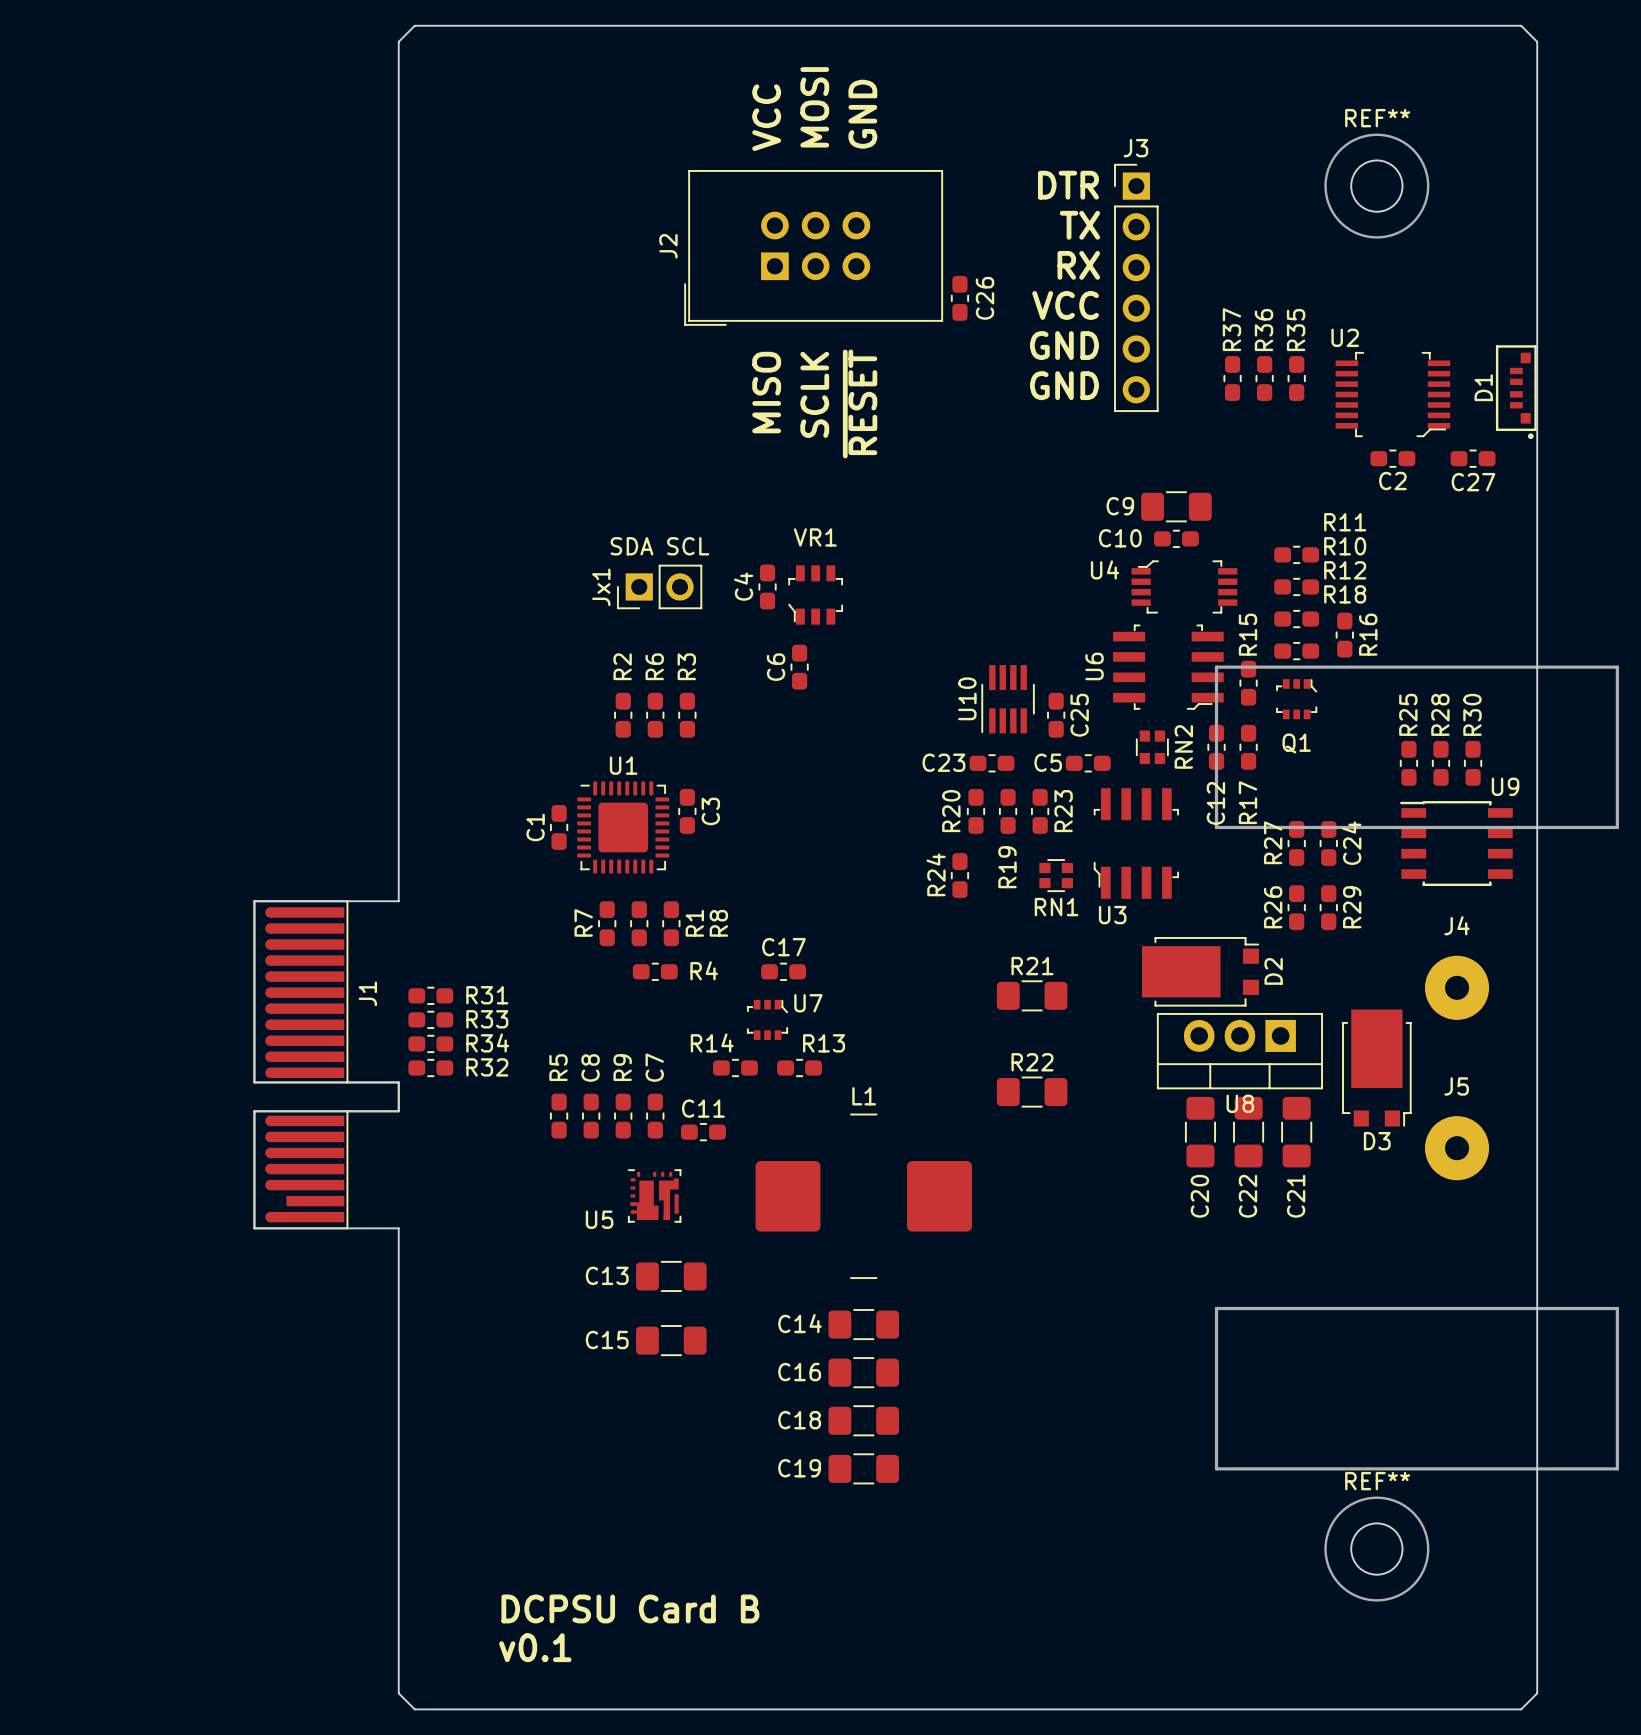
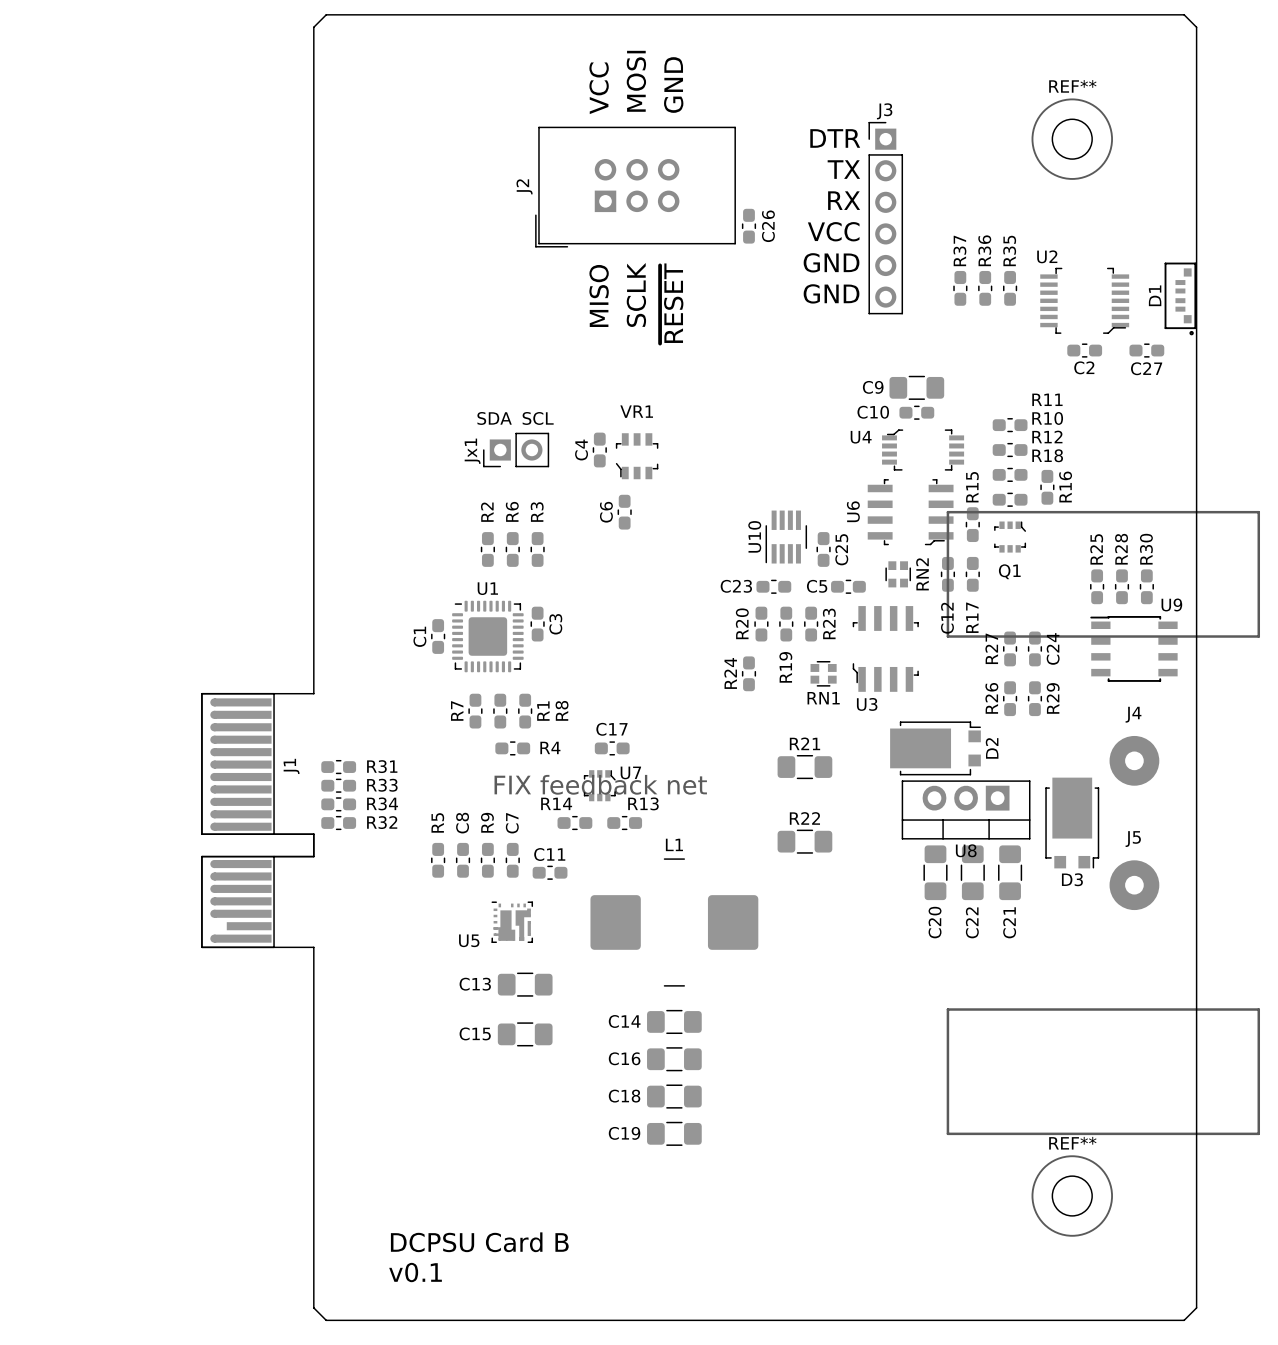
text: none -> FIX feedback net (600, 784)

